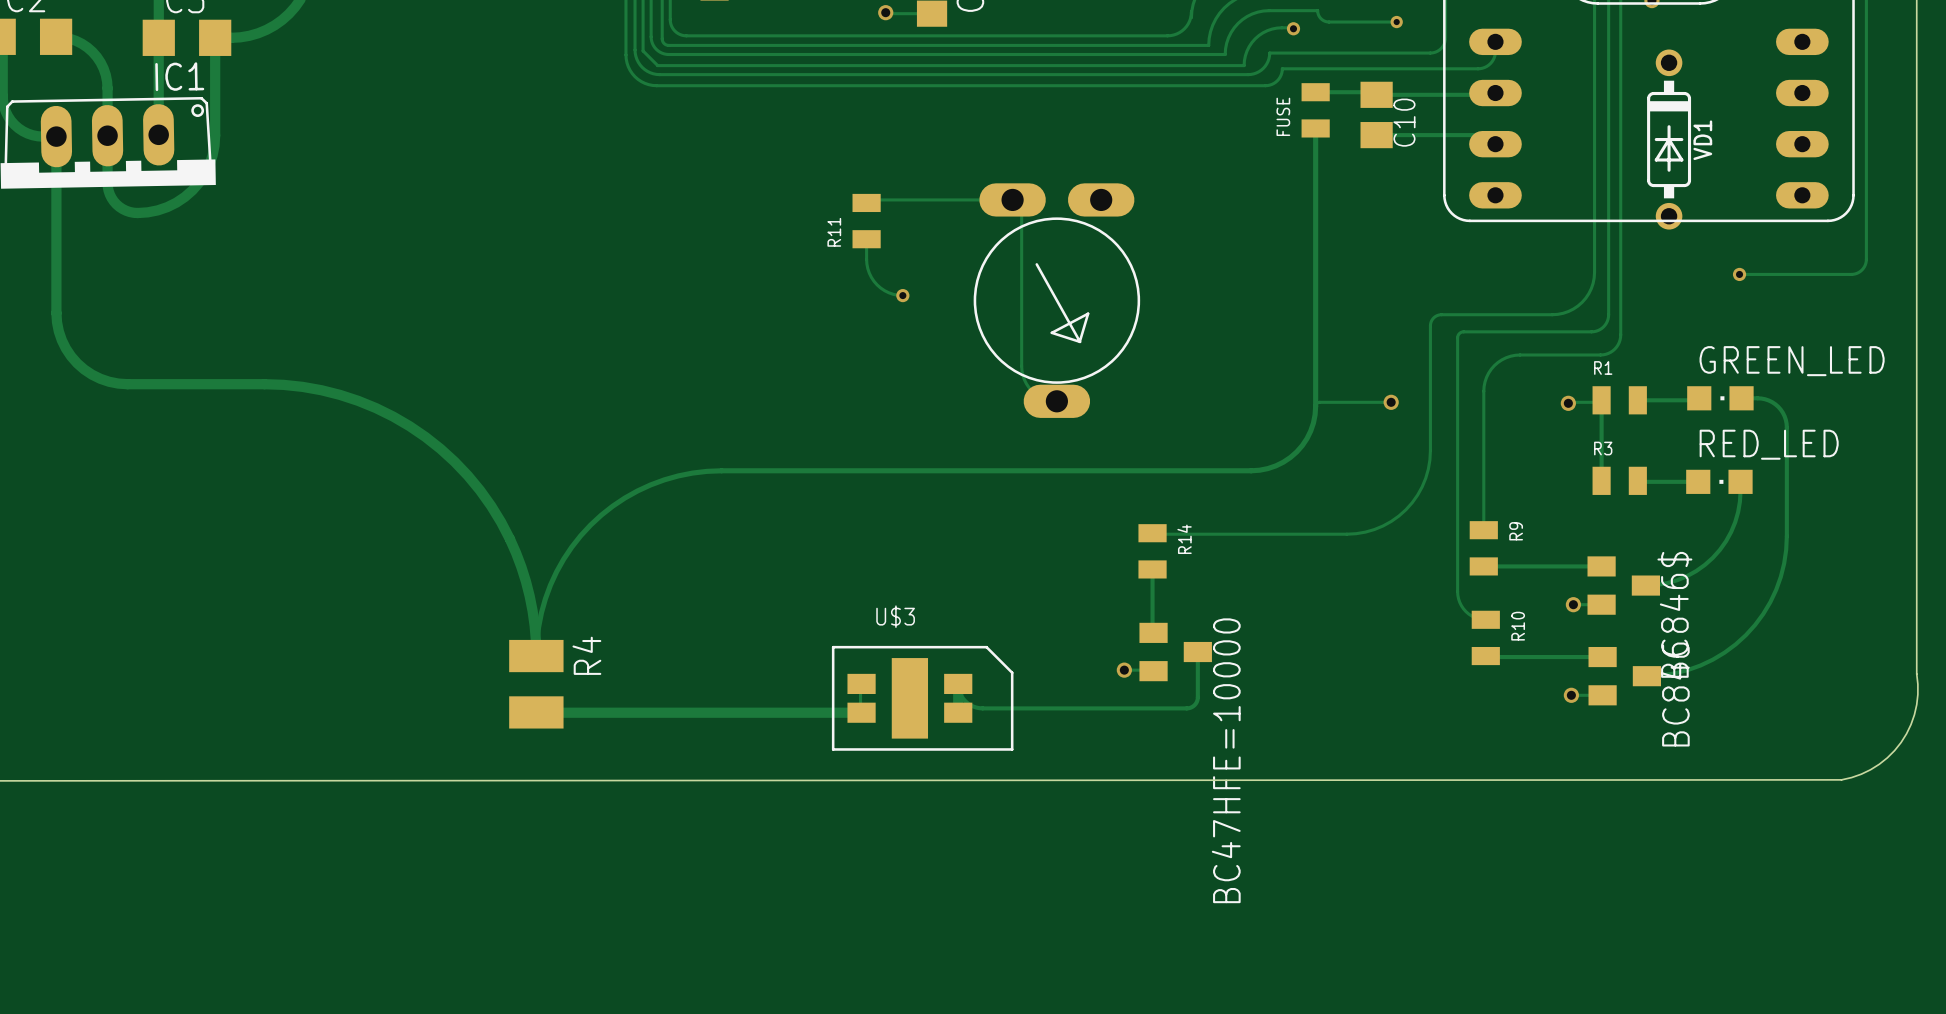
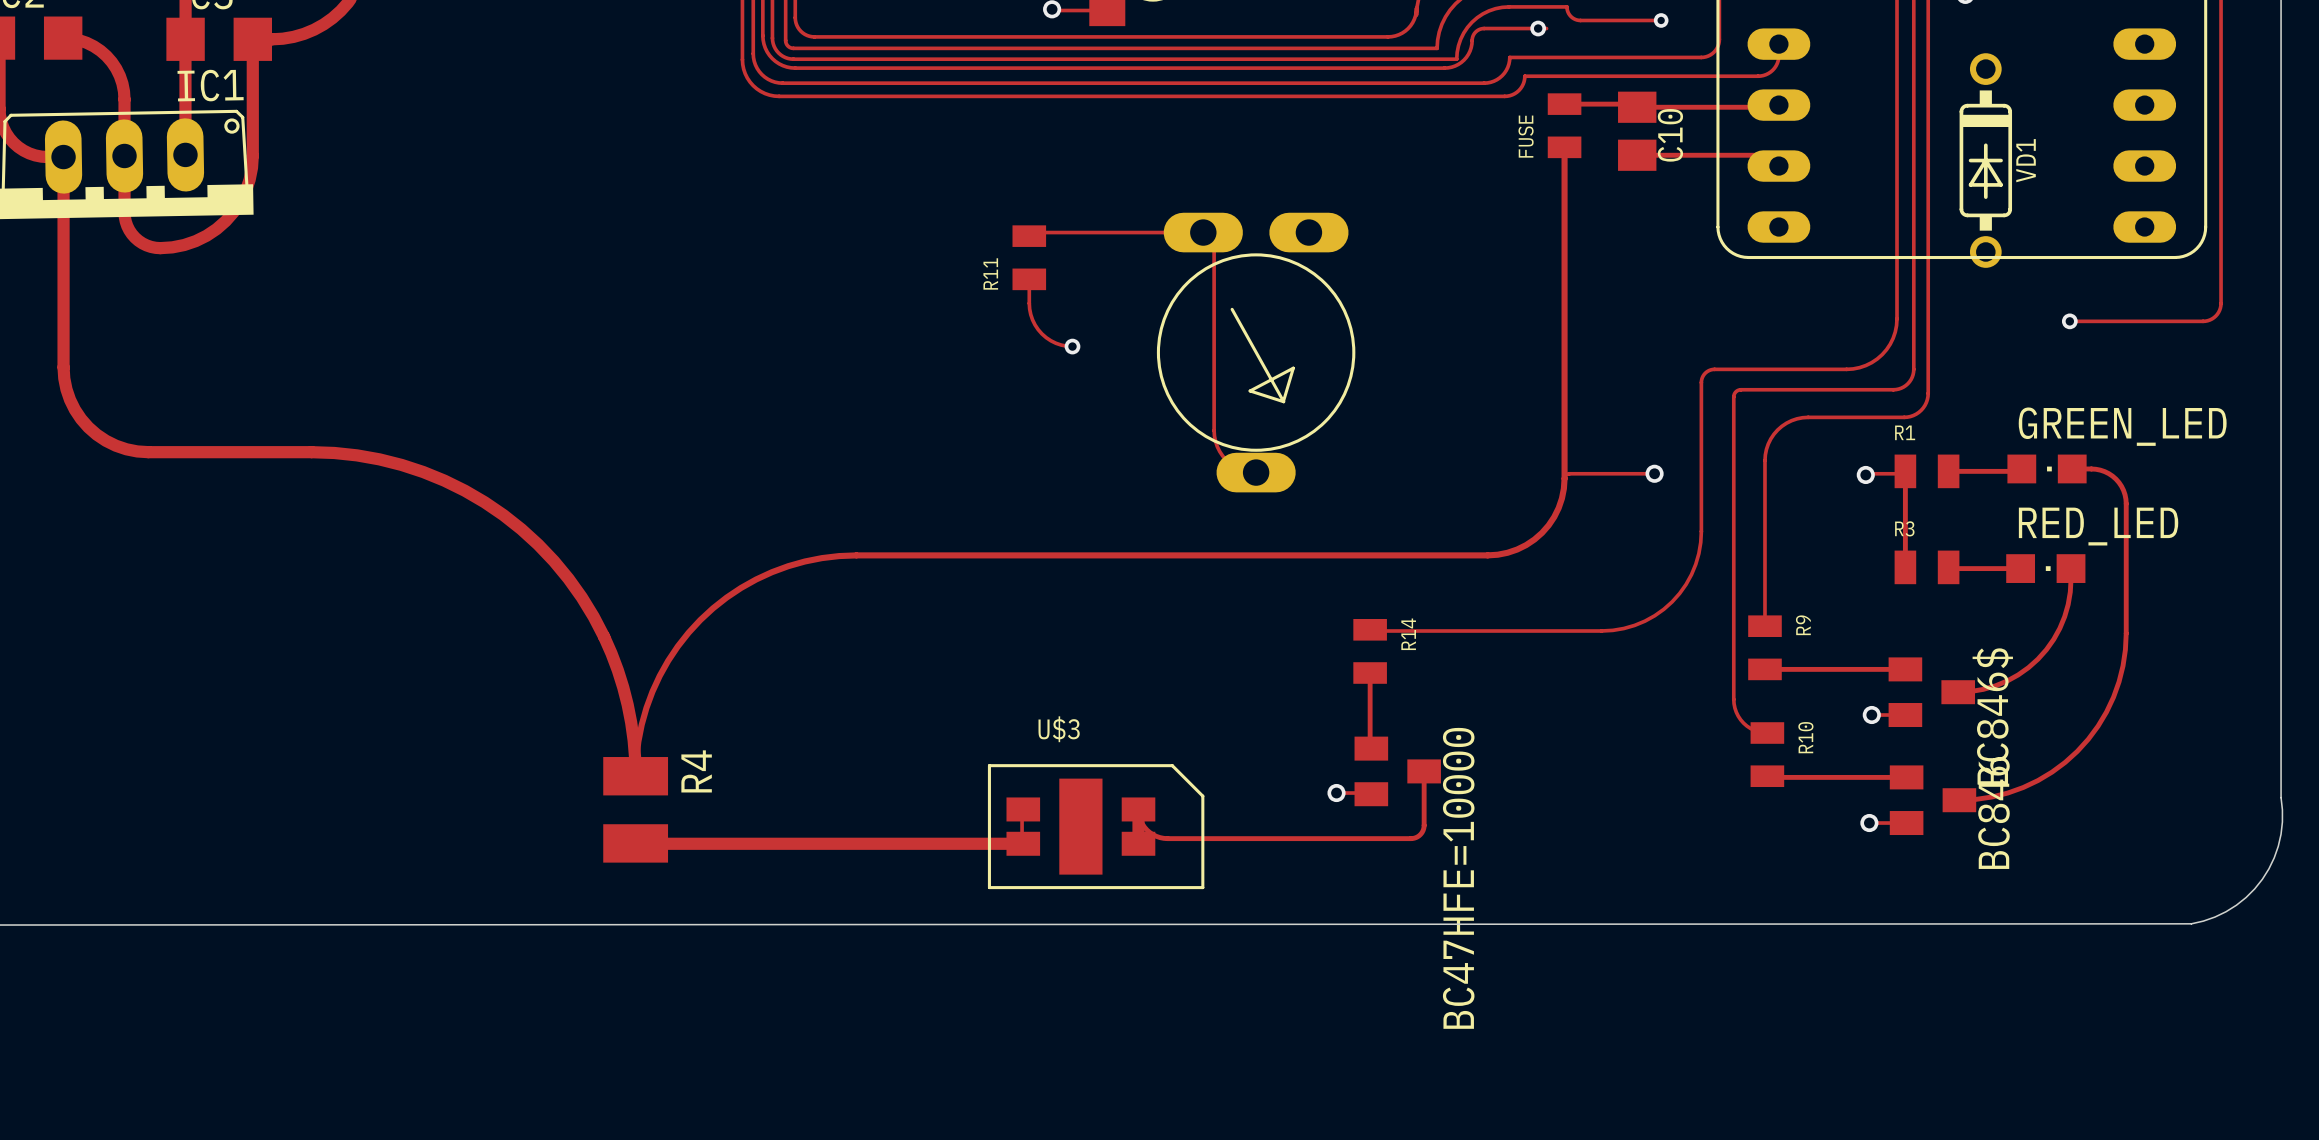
track: (1293, 28) (1277, 28) (1258, 35) (1246, 51) (1244, 65) (657, 65) (643, 50) (643, 34) -> (1546, 28) (1479, 29) (1473, 34) (1470, 51) (1464, 60) (1455, 66) (1444, 68) (795, 68) (782, 65) (772, 58) (765, 48) (762, 35)

